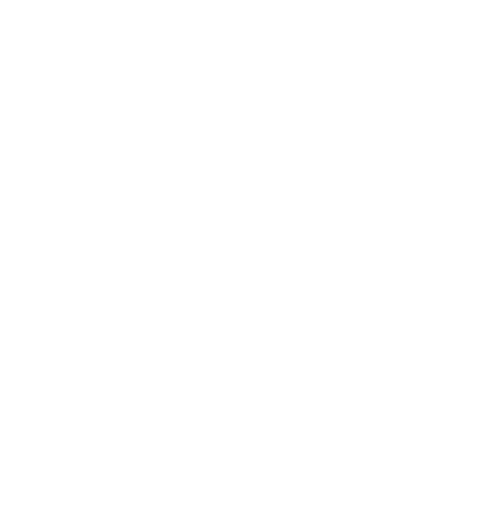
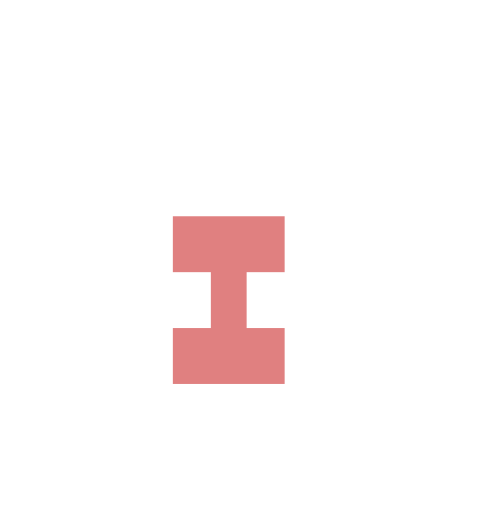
part: none -> (228, 300)

